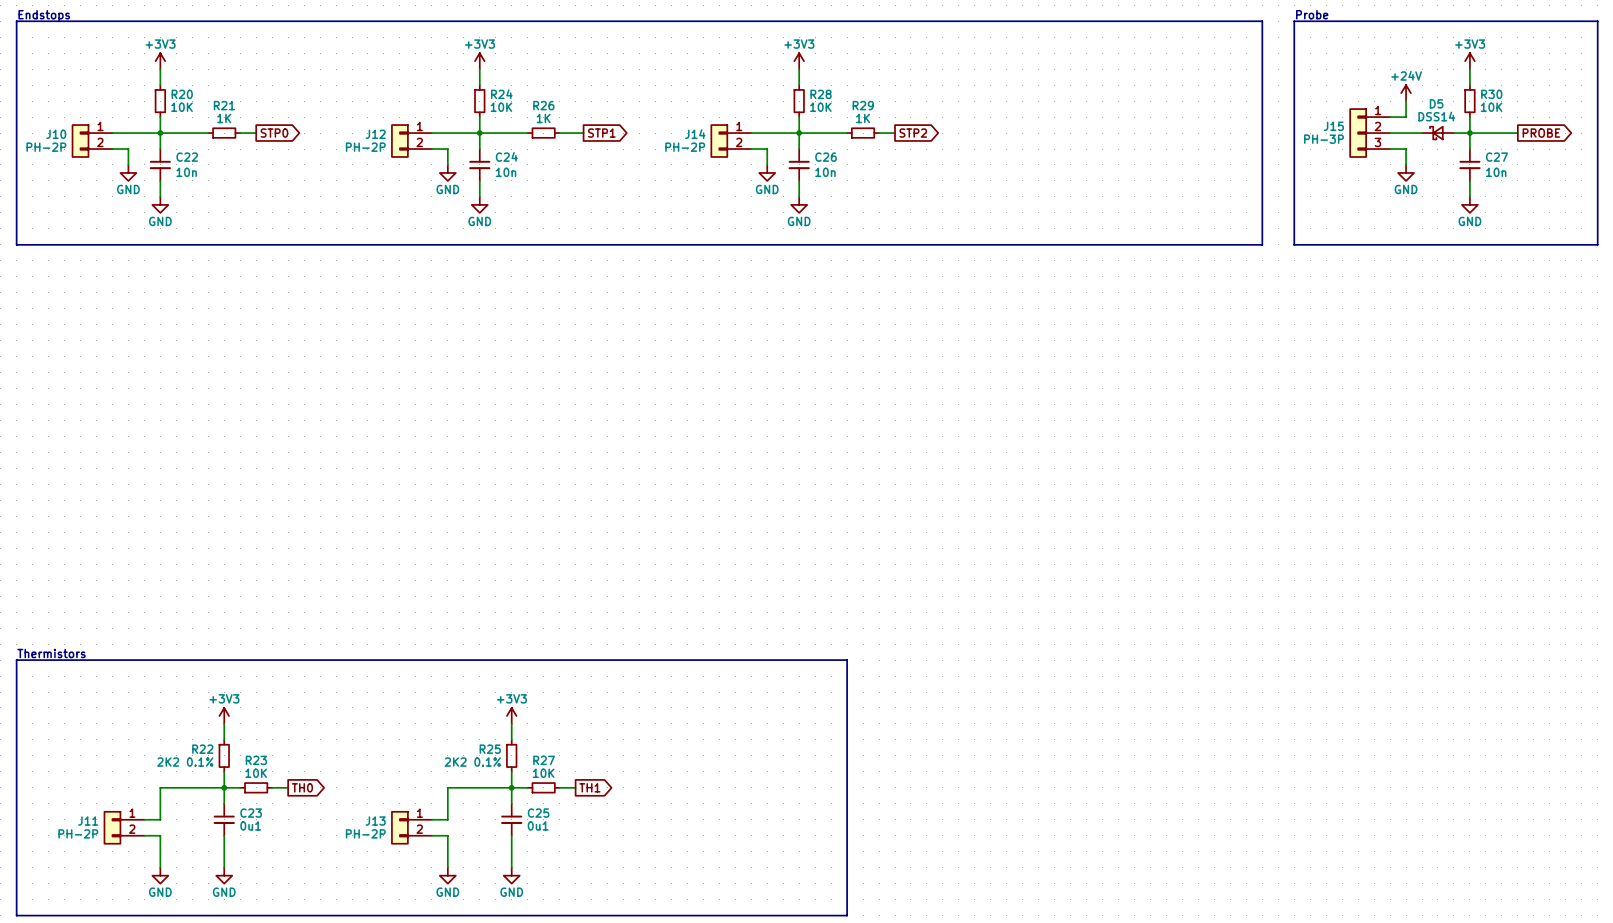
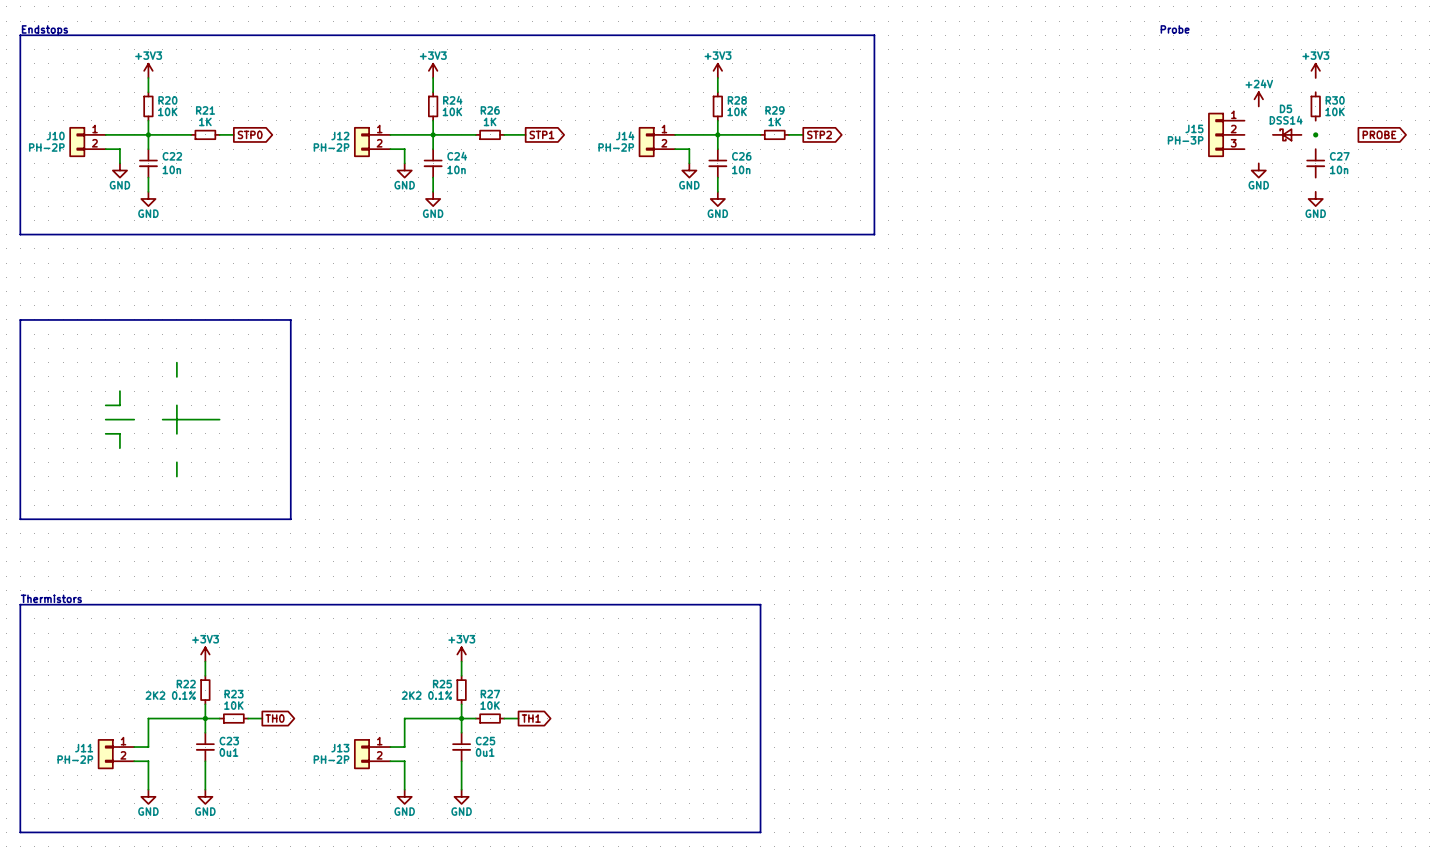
line: (974, 21) (1262, 21) (1262, 244) (974, 244) -> (874, 35) (874, 234)
line: (1294, 21) (1597, 21) (1597, 244) (1294, 244) (1294, 21) -> none
wire: (1469, 69) (1469, 85) -> none
wire: (1406, 101) (1406, 117) (1390, 117) -> none
wire: (1469, 117) (1469, 149) -> none
wire: (1390, 133) (1422, 133) -> none
wire: (1453, 133) (1517, 133) -> none
wire: (1390, 149) (1406, 149) (1406, 164) -> none
wire: (1469, 180) (1469, 196) -> none
line: none -> (20, 319) (20, 519) (290, 519) (290, 319) (20, 319)
wire: none -> (176, 362) (176, 376)
wire: none -> (119, 391) (119, 405) (105, 405)
wire: none -> (176, 405) (176, 433)
wire: none -> (105, 419) (134, 419)
wire: none -> (162, 419) (219, 419)
wire: none -> (105, 433) (119, 433) (119, 448)
wire: none -> (176, 462) (176, 476)

